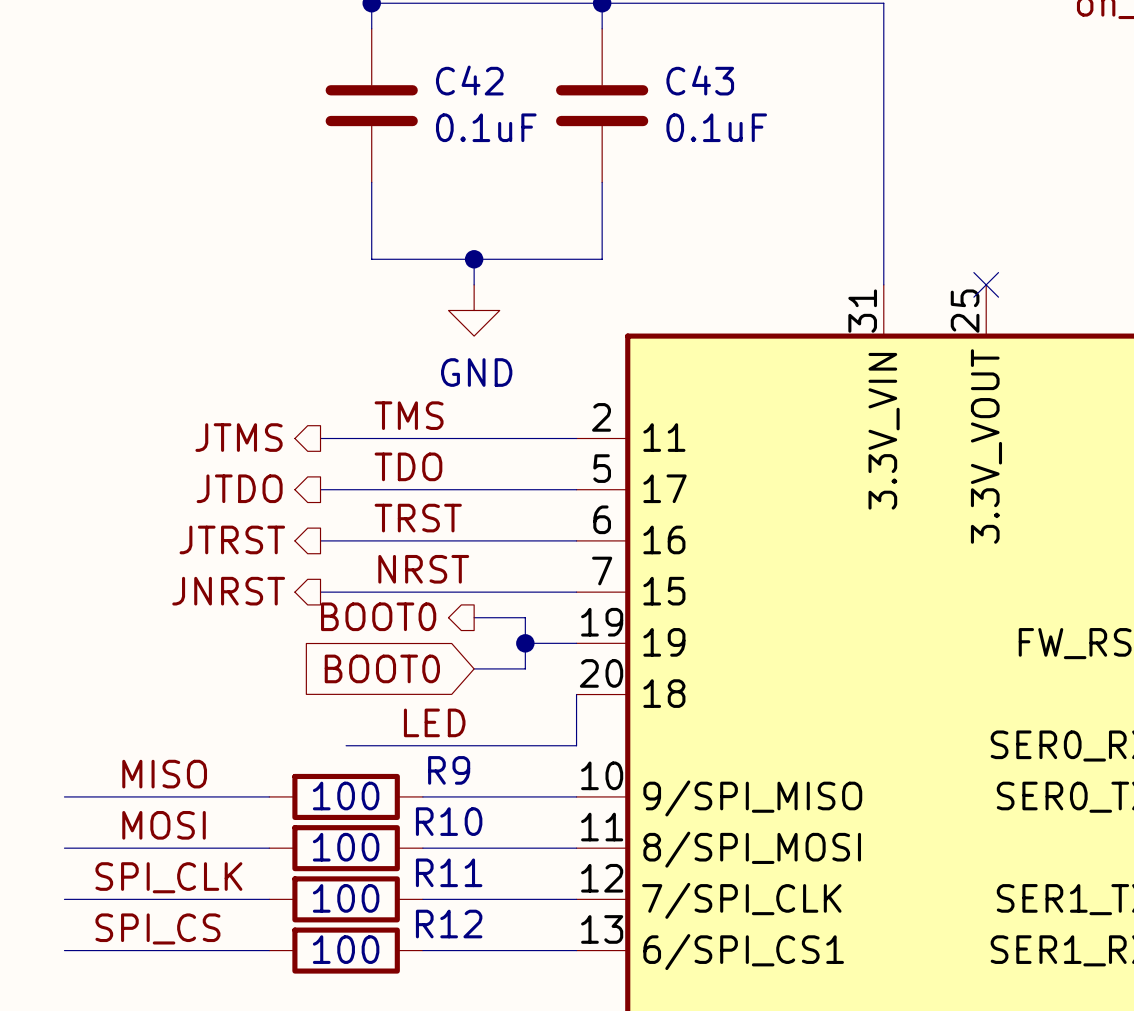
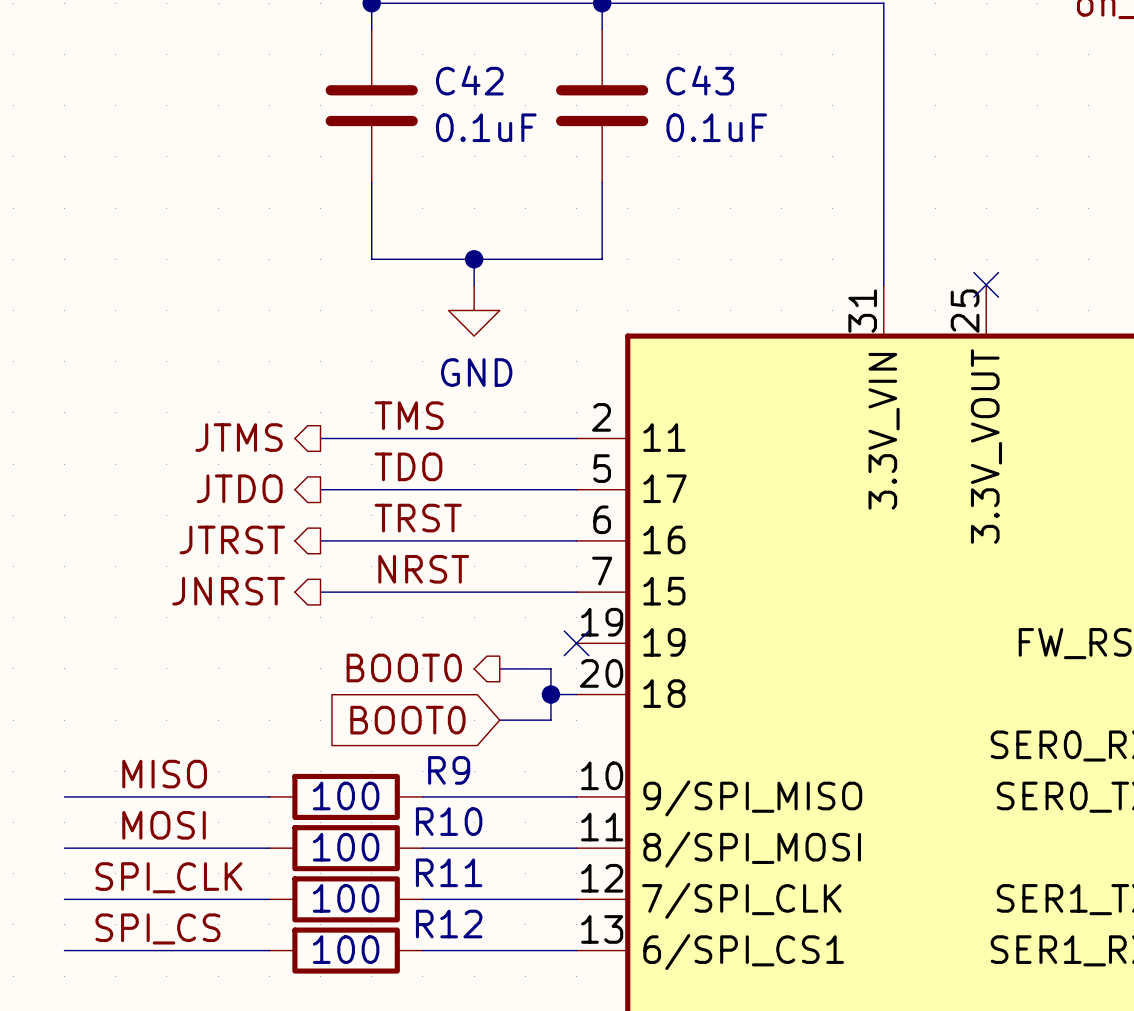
hierarchical label position: BOOT0 (378, 616) -> BOOT0 (404, 667)
wire: (474, 617) (525, 617) (525, 668) -> (499, 720) (550, 720) (550, 668) (525, 668)
wire: (525, 643) (576, 643) -> none
junction position: (525, 643) -> (550, 694)
no-connect mark: none -> (576, 643)
global label position: BOOT0 (382, 668) -> BOOT0 (407, 720)
wire: (474, 668) (499, 668) -> none
wire: (576, 694) (576, 745) (346, 745) -> (576, 694) (550, 694)
label: LED (434, 722) -> none

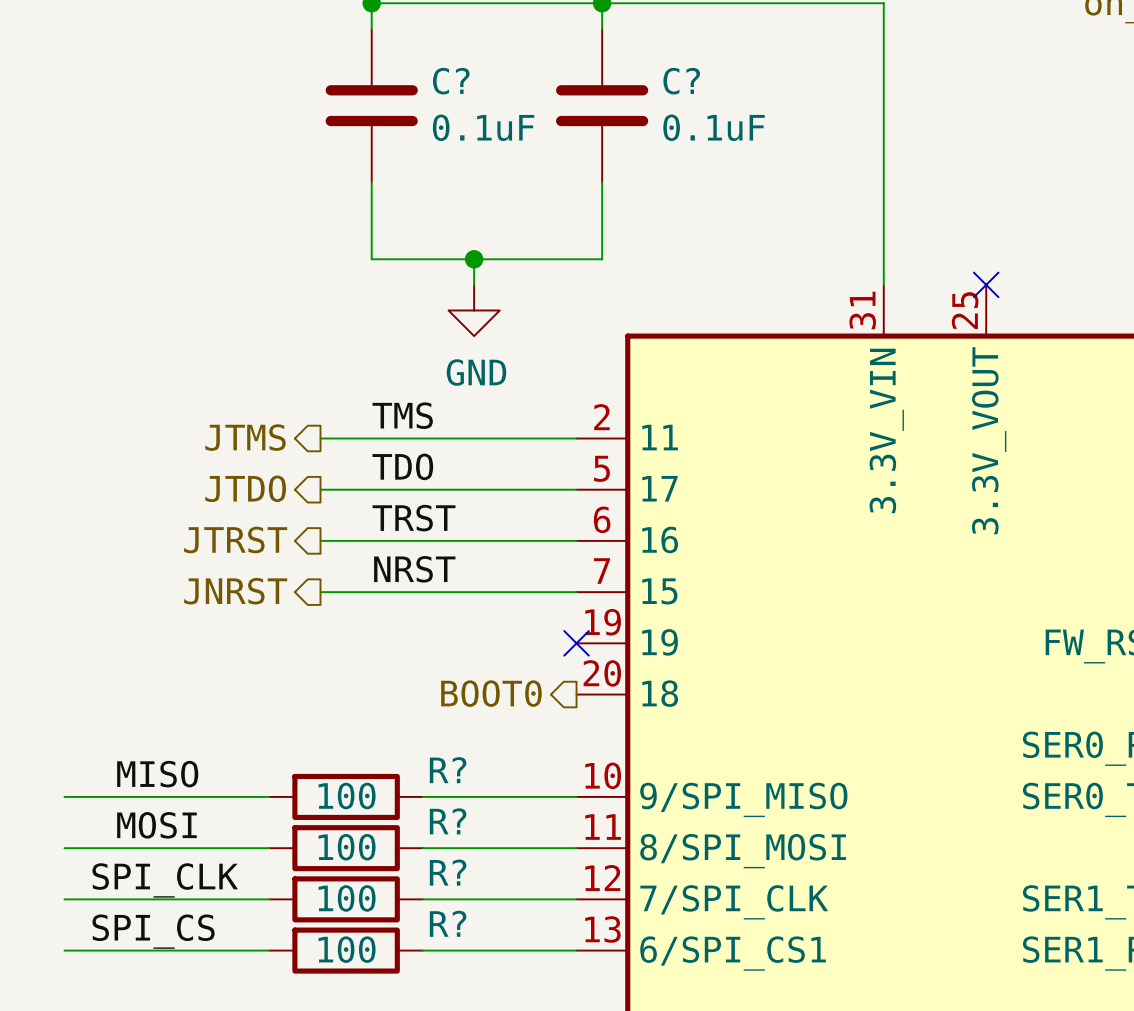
C42 name: C42 (469, 80) -> C? (451, 81)
C43 name: C43 (700, 80) -> C? (681, 81)
hierarchical label position: BOOT0 (404, 667) -> BOOT0 (491, 693)
wire: (499, 668) (550, 668) (550, 720) (499, 720) -> none
wire: (550, 694) (576, 694) -> none
junction: (550, 694) -> none
global label: BOOT0 (407, 720) -> none
R9 name: R9 (449, 770) -> R? (448, 770)
R10 name: R10 (449, 821) -> R? (448, 821)
R11 name: R11 (449, 872) -> R? (448, 872)
R12 name: R12 (449, 924) -> R? (448, 923)

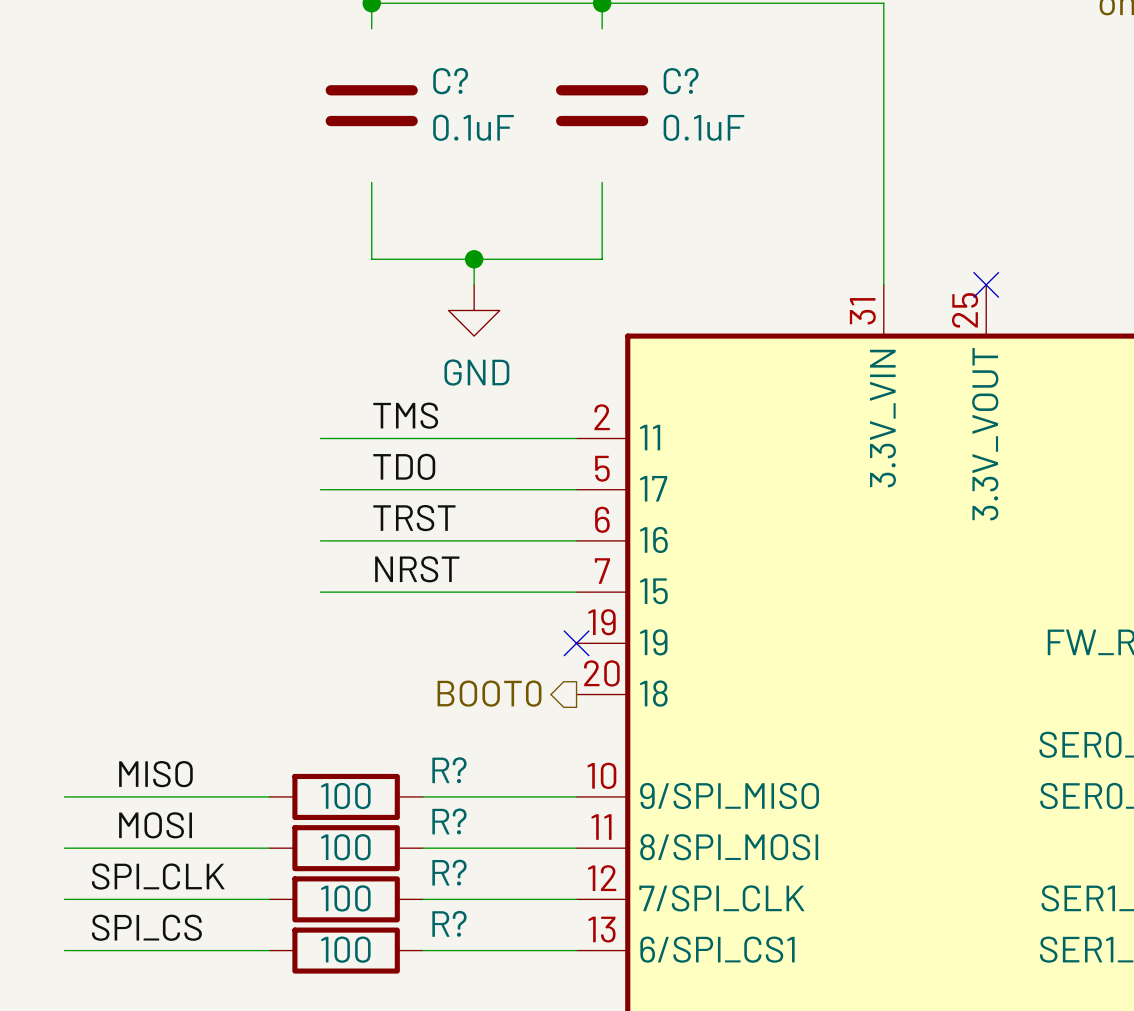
C? symbol: [325, 28, 418, 183] -> [325, 85, 418, 127]
C? symbol: [556, 28, 649, 183] -> [556, 85, 649, 127]
hierarchical label: JTMS (245, 437) -> none
hierarchical label: JTDO (245, 488) -> none
hierarchical label: JTRST (235, 539) -> none
hierarchical label: JNRST (235, 591) -> none

